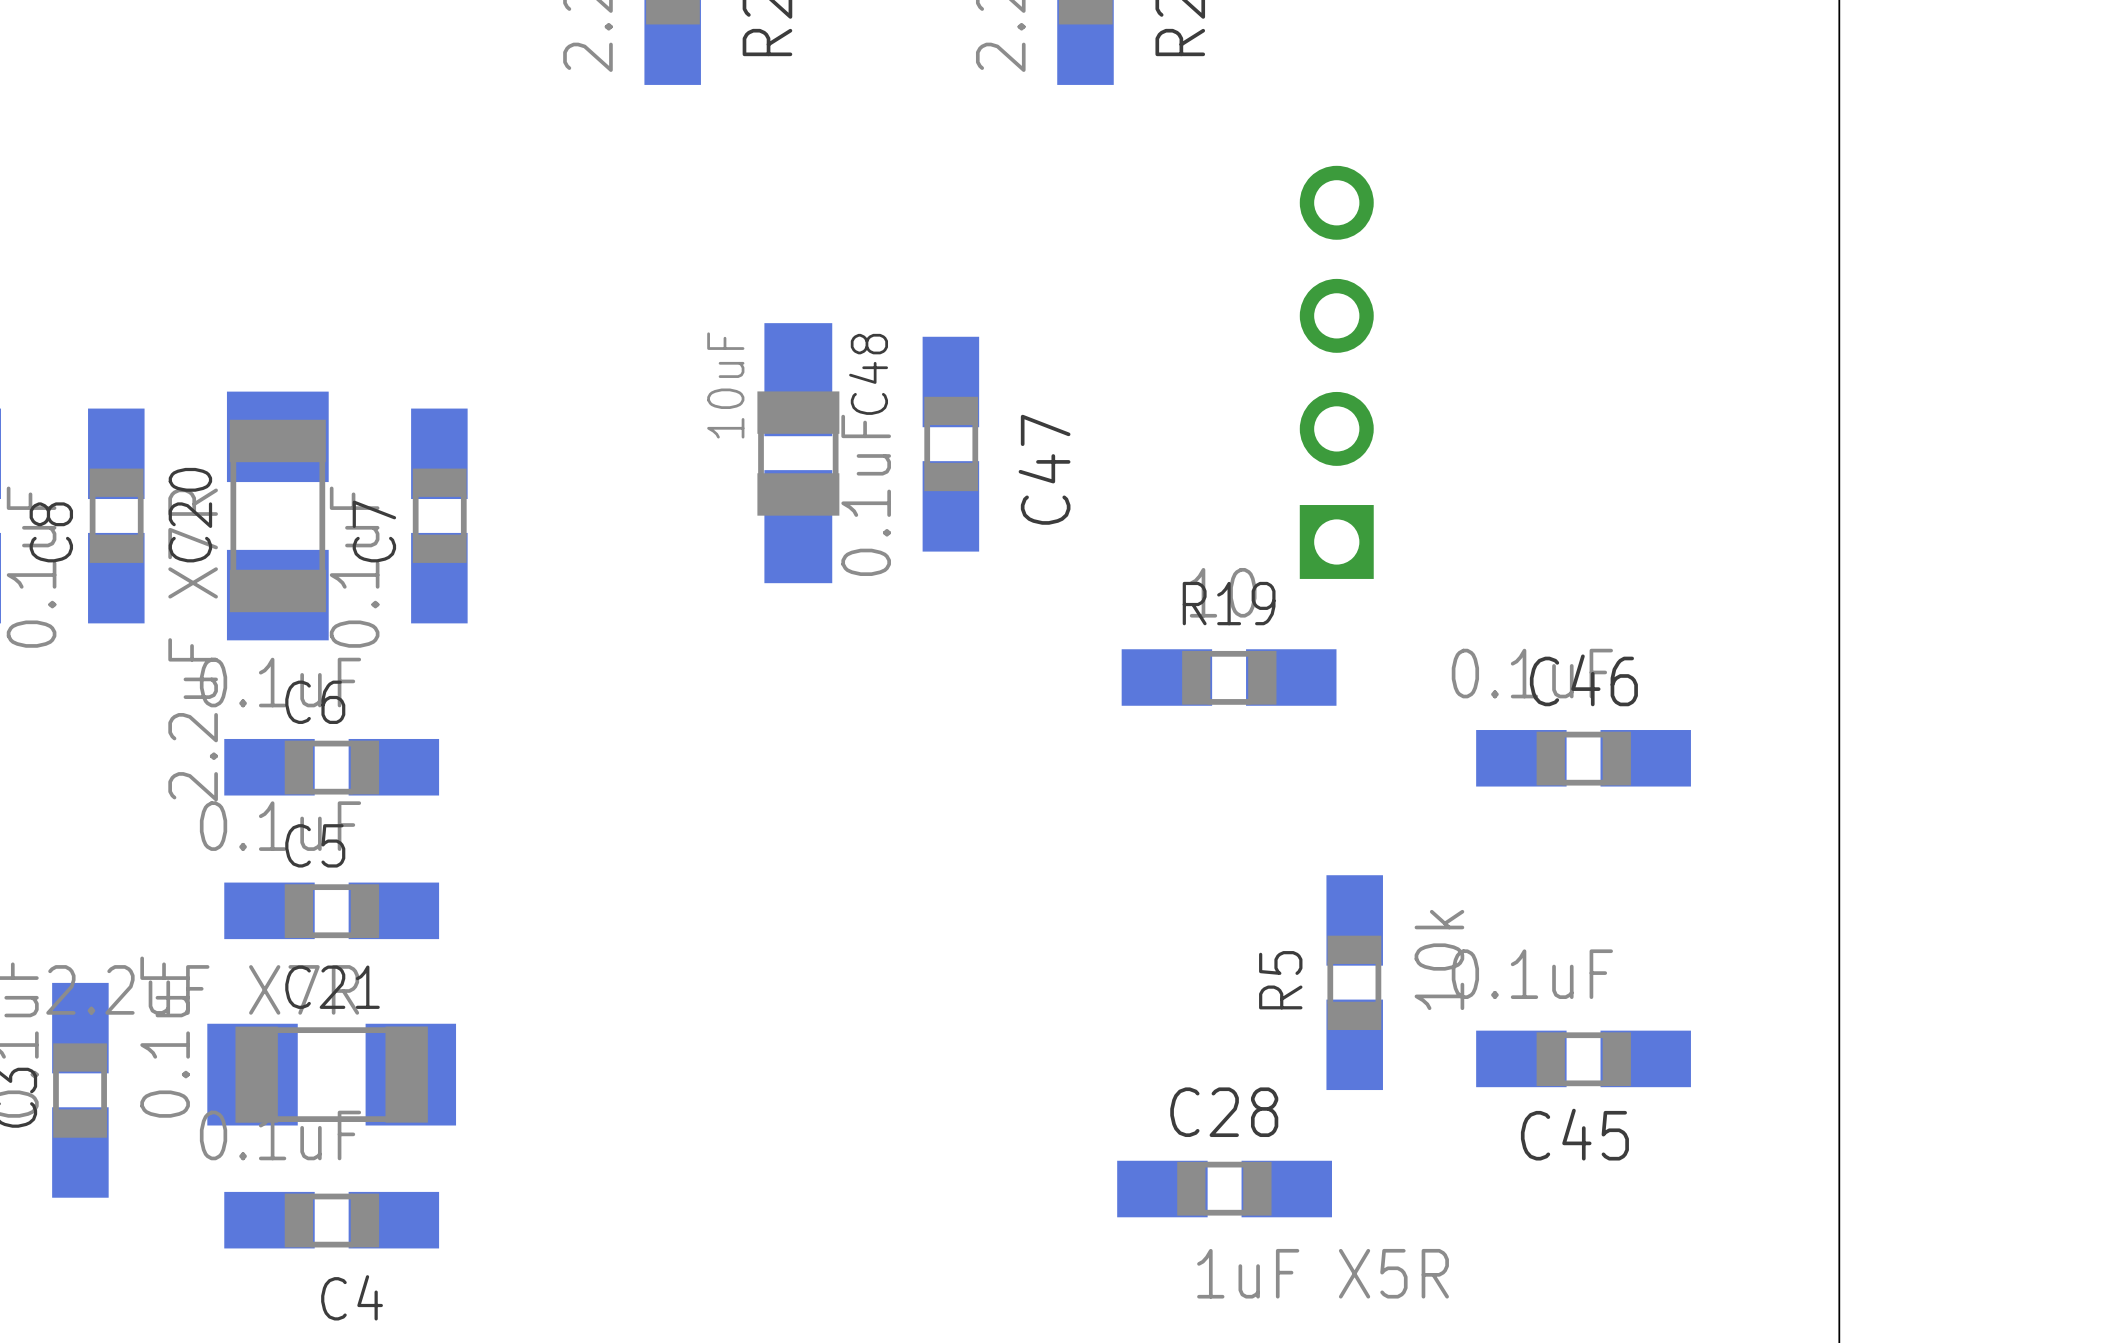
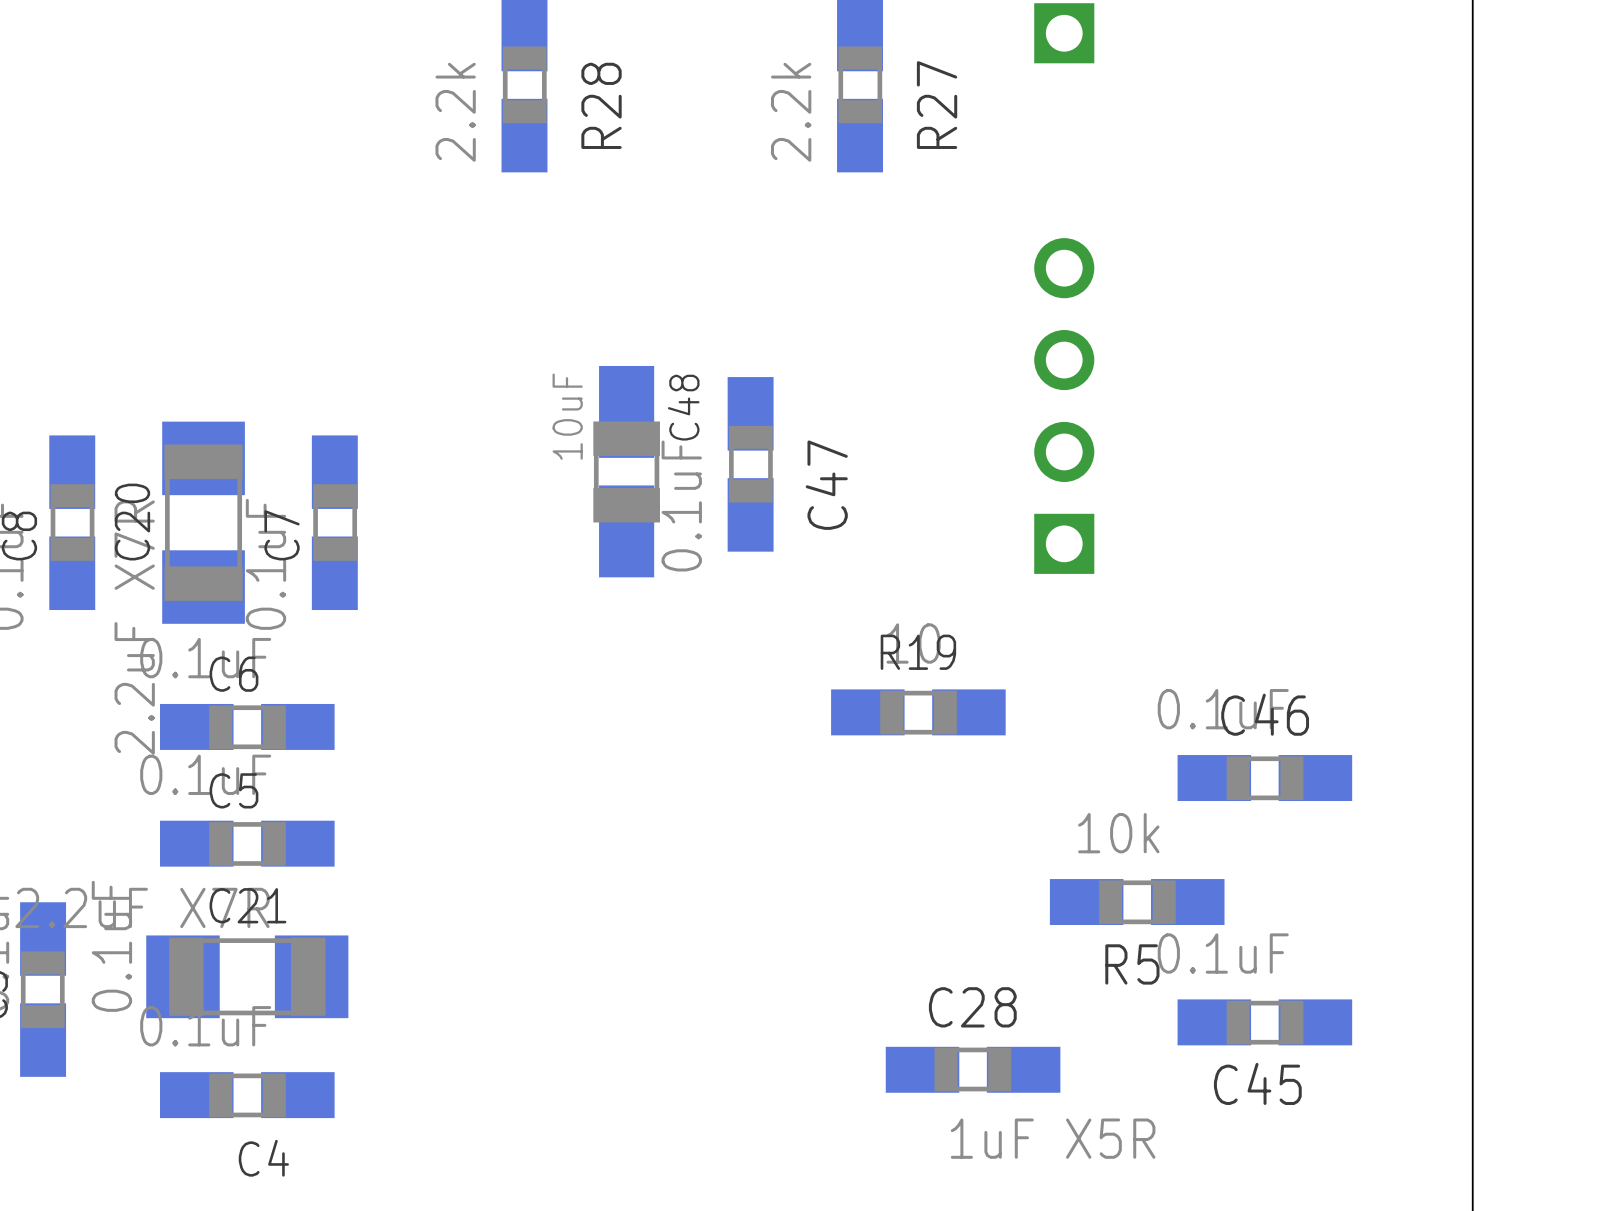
R19 position: (1229, 677) -> (918, 712)
C46 position: (1583, 758) -> (1264, 778)
R5 value position: 10k (1439, 959) -> 10k (1118, 833)
R5 rotation: 0° (1354, 982) -> 90° clockwise (1137, 902)
C45 position: (1583, 1058) -> (1264, 1022)

